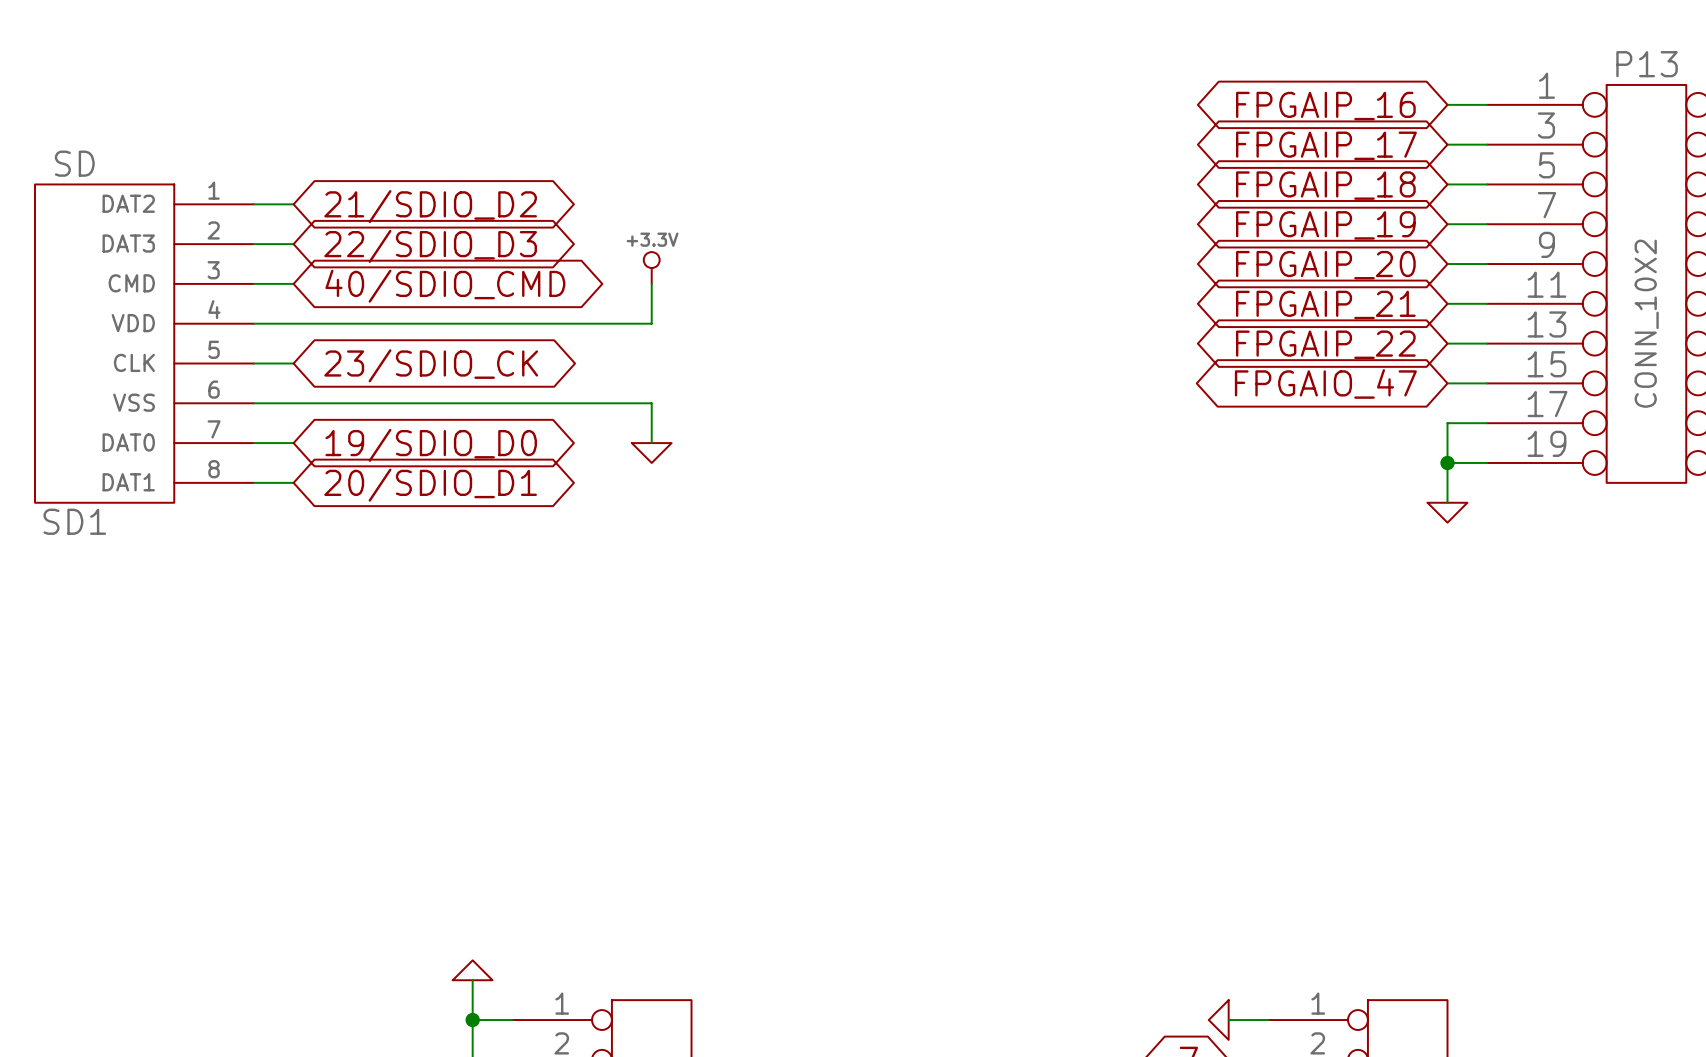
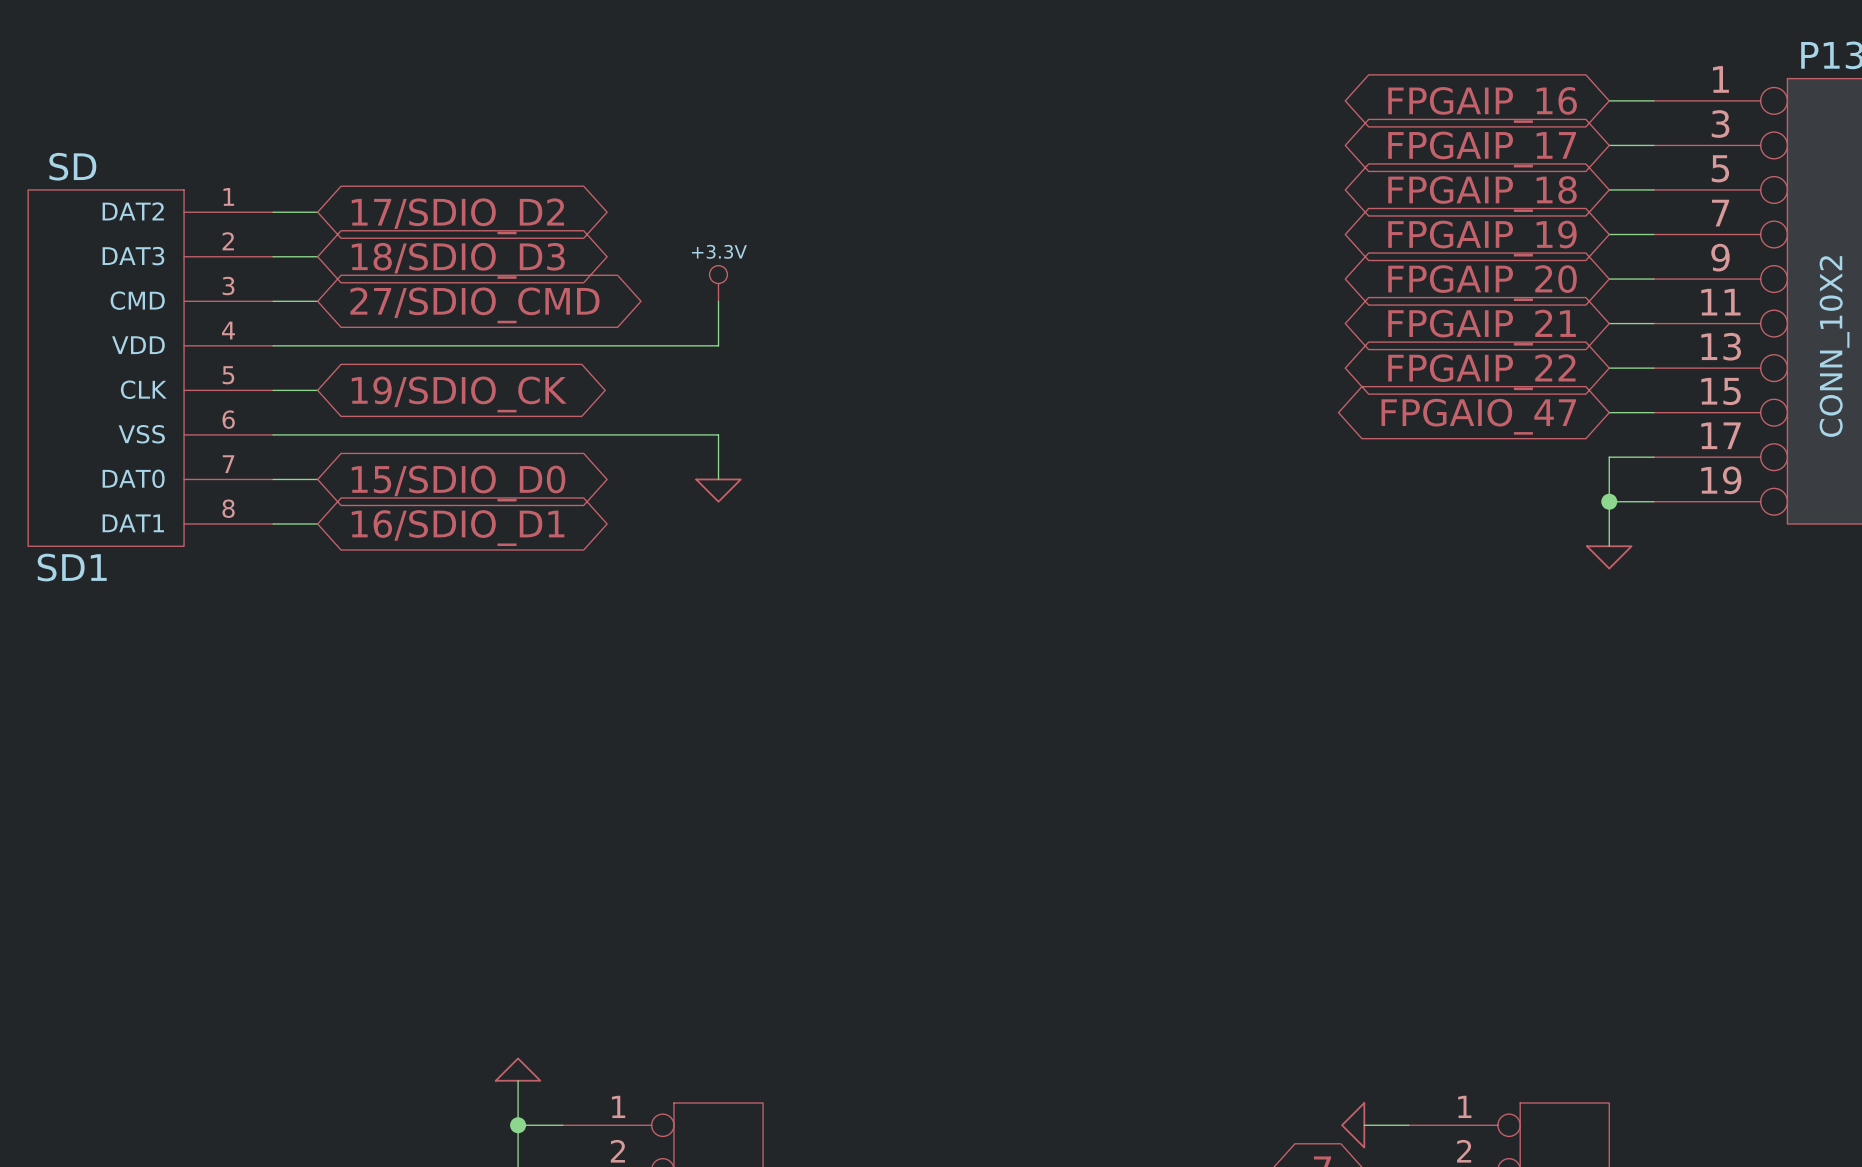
global label: 21/SDIO_D2 (430, 206) -> 17/SDIO_D2 (457, 216)
global label: 22/SDIO_D3 (430, 246) -> 18/SDIO_D3 (458, 260)
global label: 40/SDIO_CMD (445, 286) -> 27/SDIO_CMD (474, 305)
global label: 23/SDIO_CK (431, 365) -> 19/SDIO_CK (459, 394)
global label: 19/SDIO_D0 (431, 445) -> 15/SDIO_D0 (458, 483)
global label: 20/SDIO_D1 (430, 485) -> 16/SDIO_D1 (458, 528)

